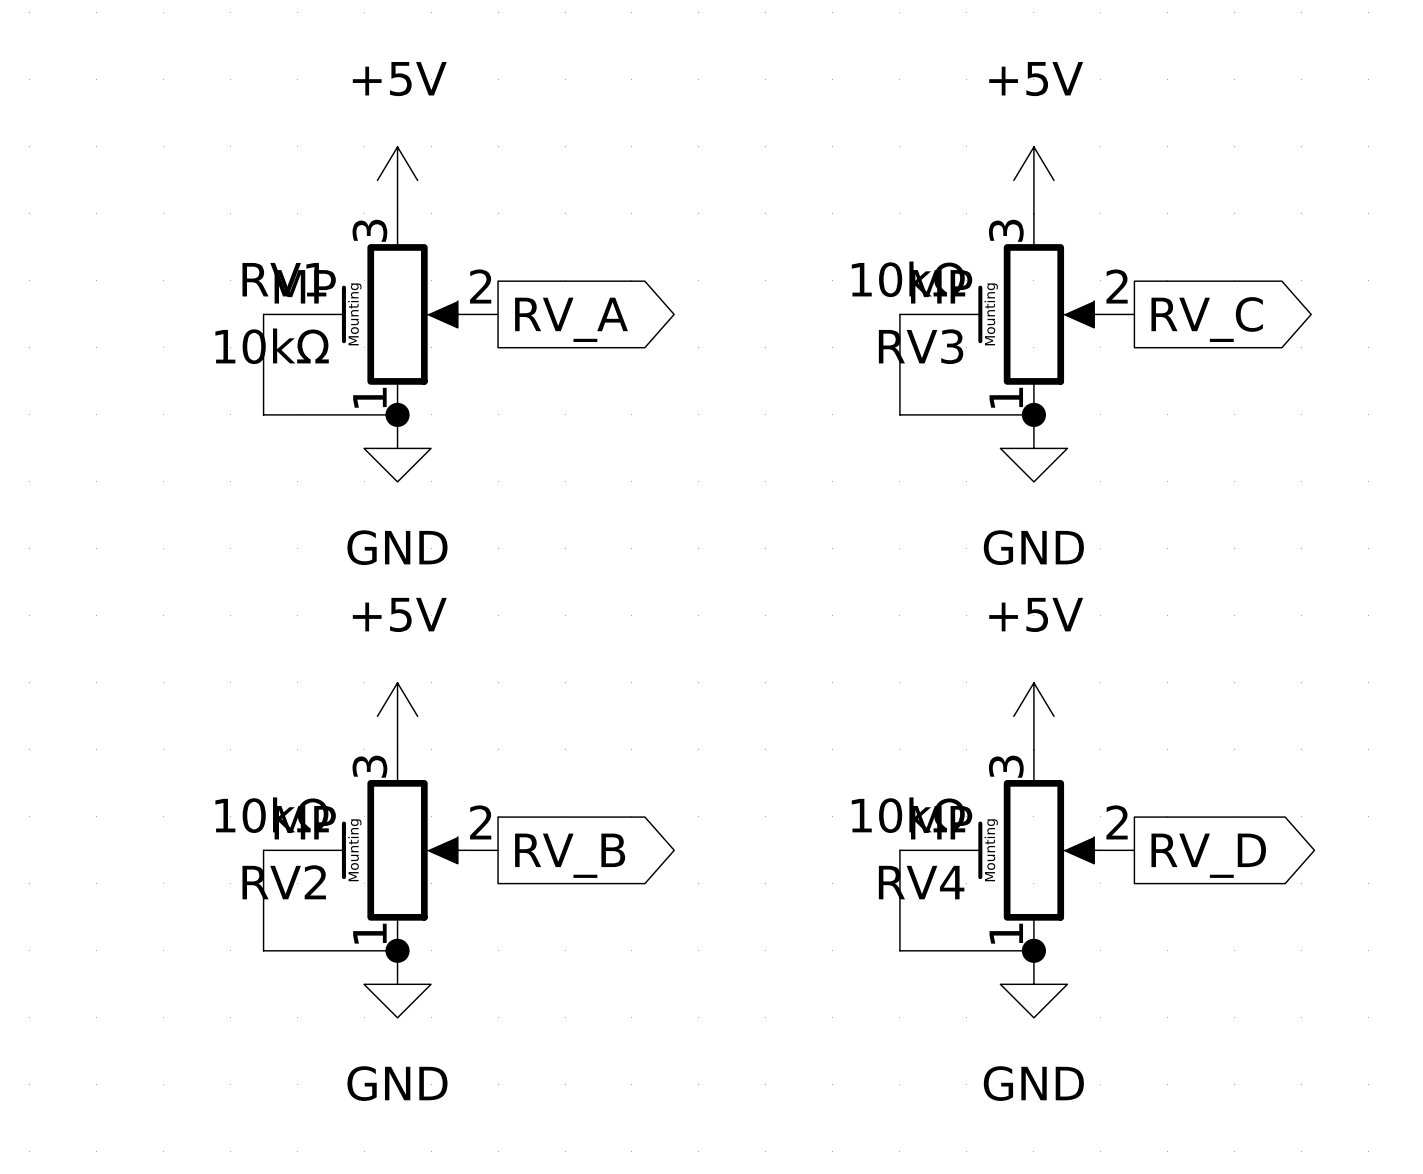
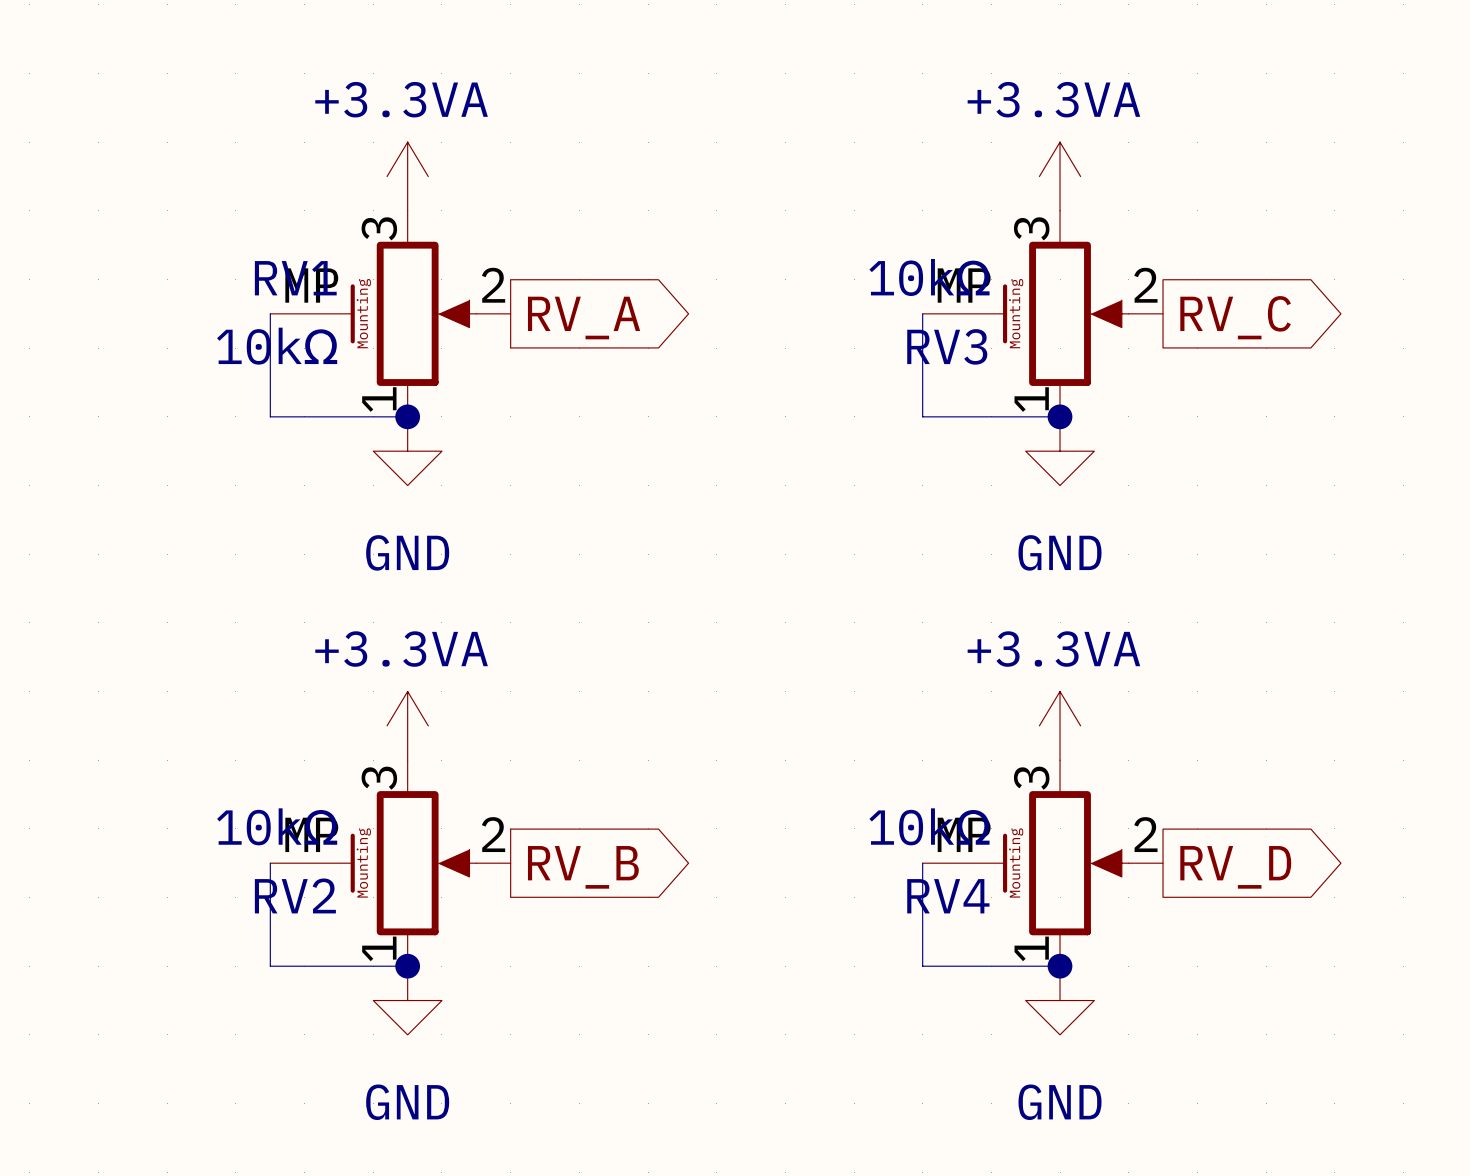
power symbol: +5V (397, 180) -> +3.3VA (407, 176)
power symbol: +5V (1033, 180) -> +3.3VA (1060, 176)
power symbol: +5V (397, 716) -> +3.3VA (407, 725)
power symbol: +5V (1033, 716) -> +3.3VA (1060, 725)

